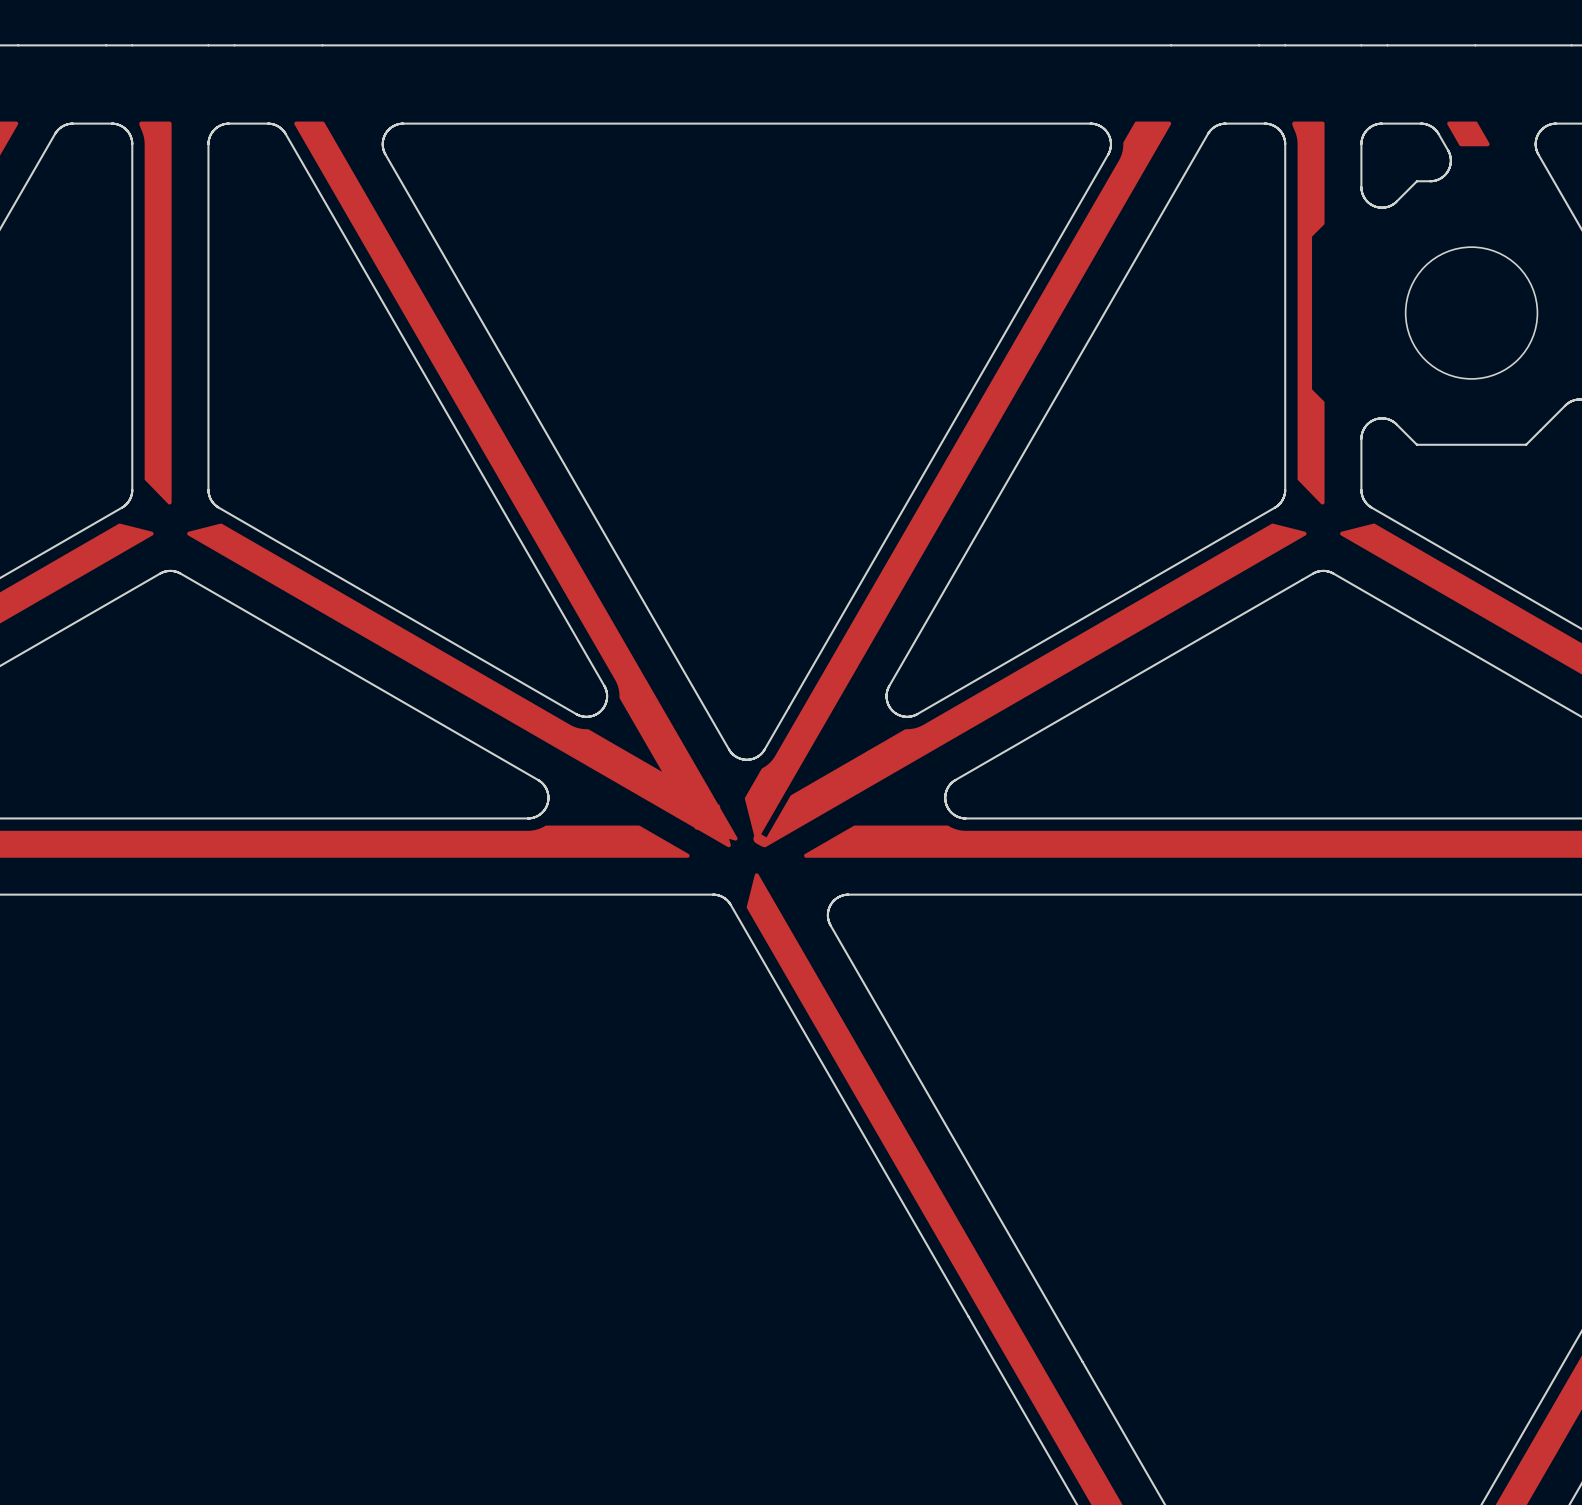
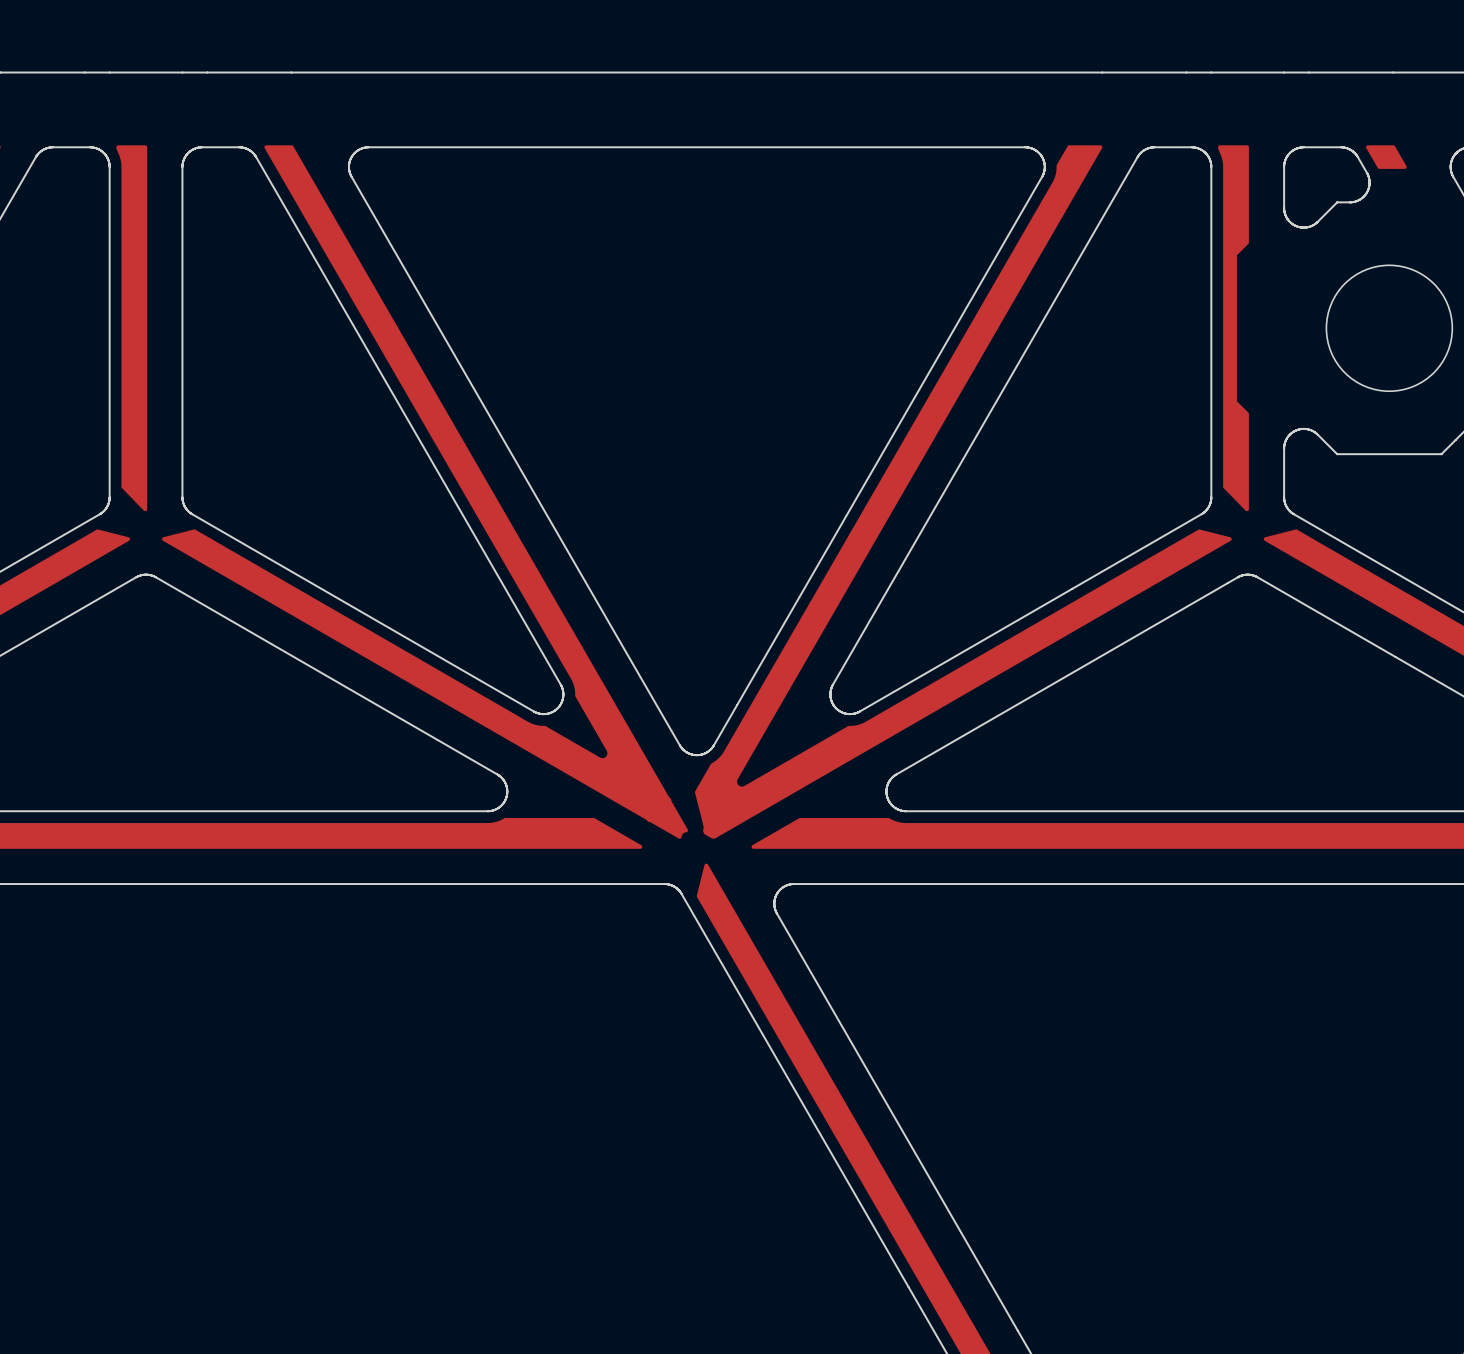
drawing shape: [187, 121, 738, 848] -> [162, 145, 688, 839]
drawing shape: [744, 121, 1307, 848] -> [694, 145, 1232, 839]

